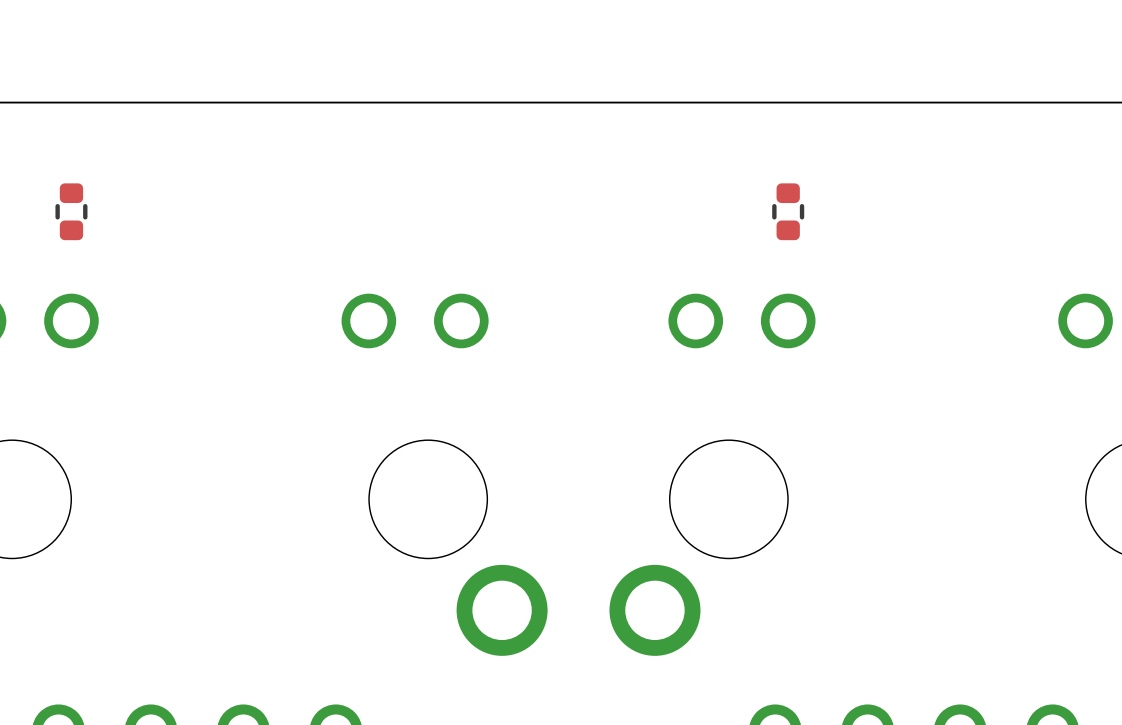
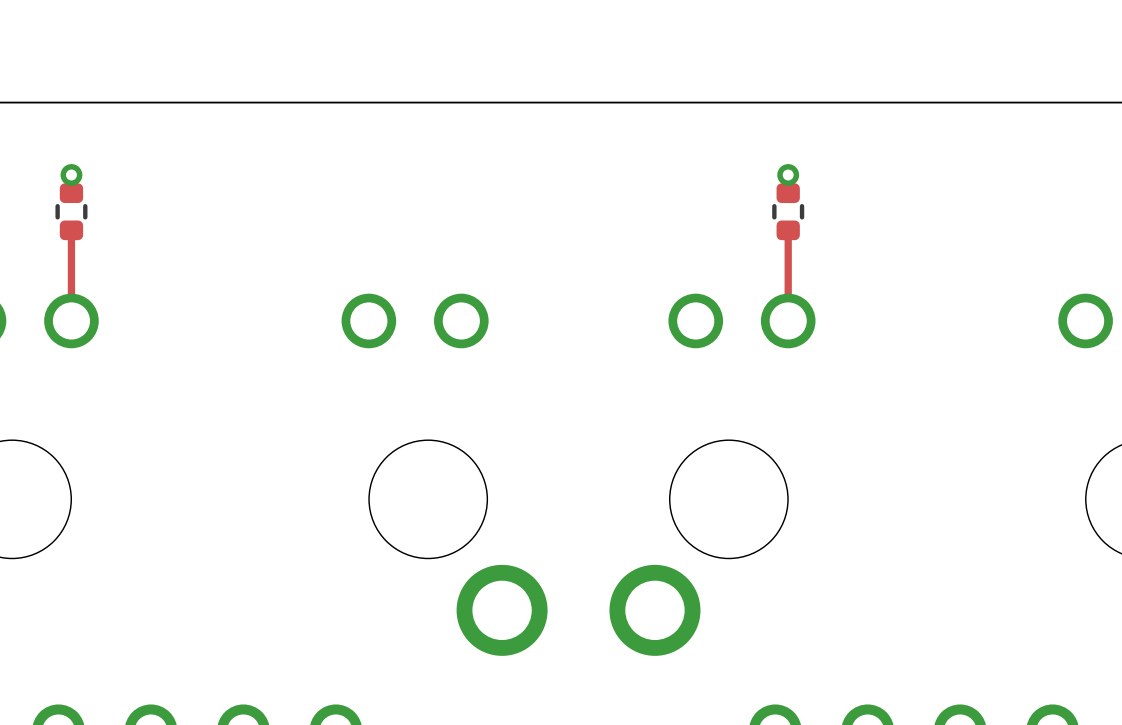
via: none -> (71, 175)
via: none -> (788, 175)
top track: none -> (71, 230) (71, 320)
top track: none -> (788, 230) (788, 320)

